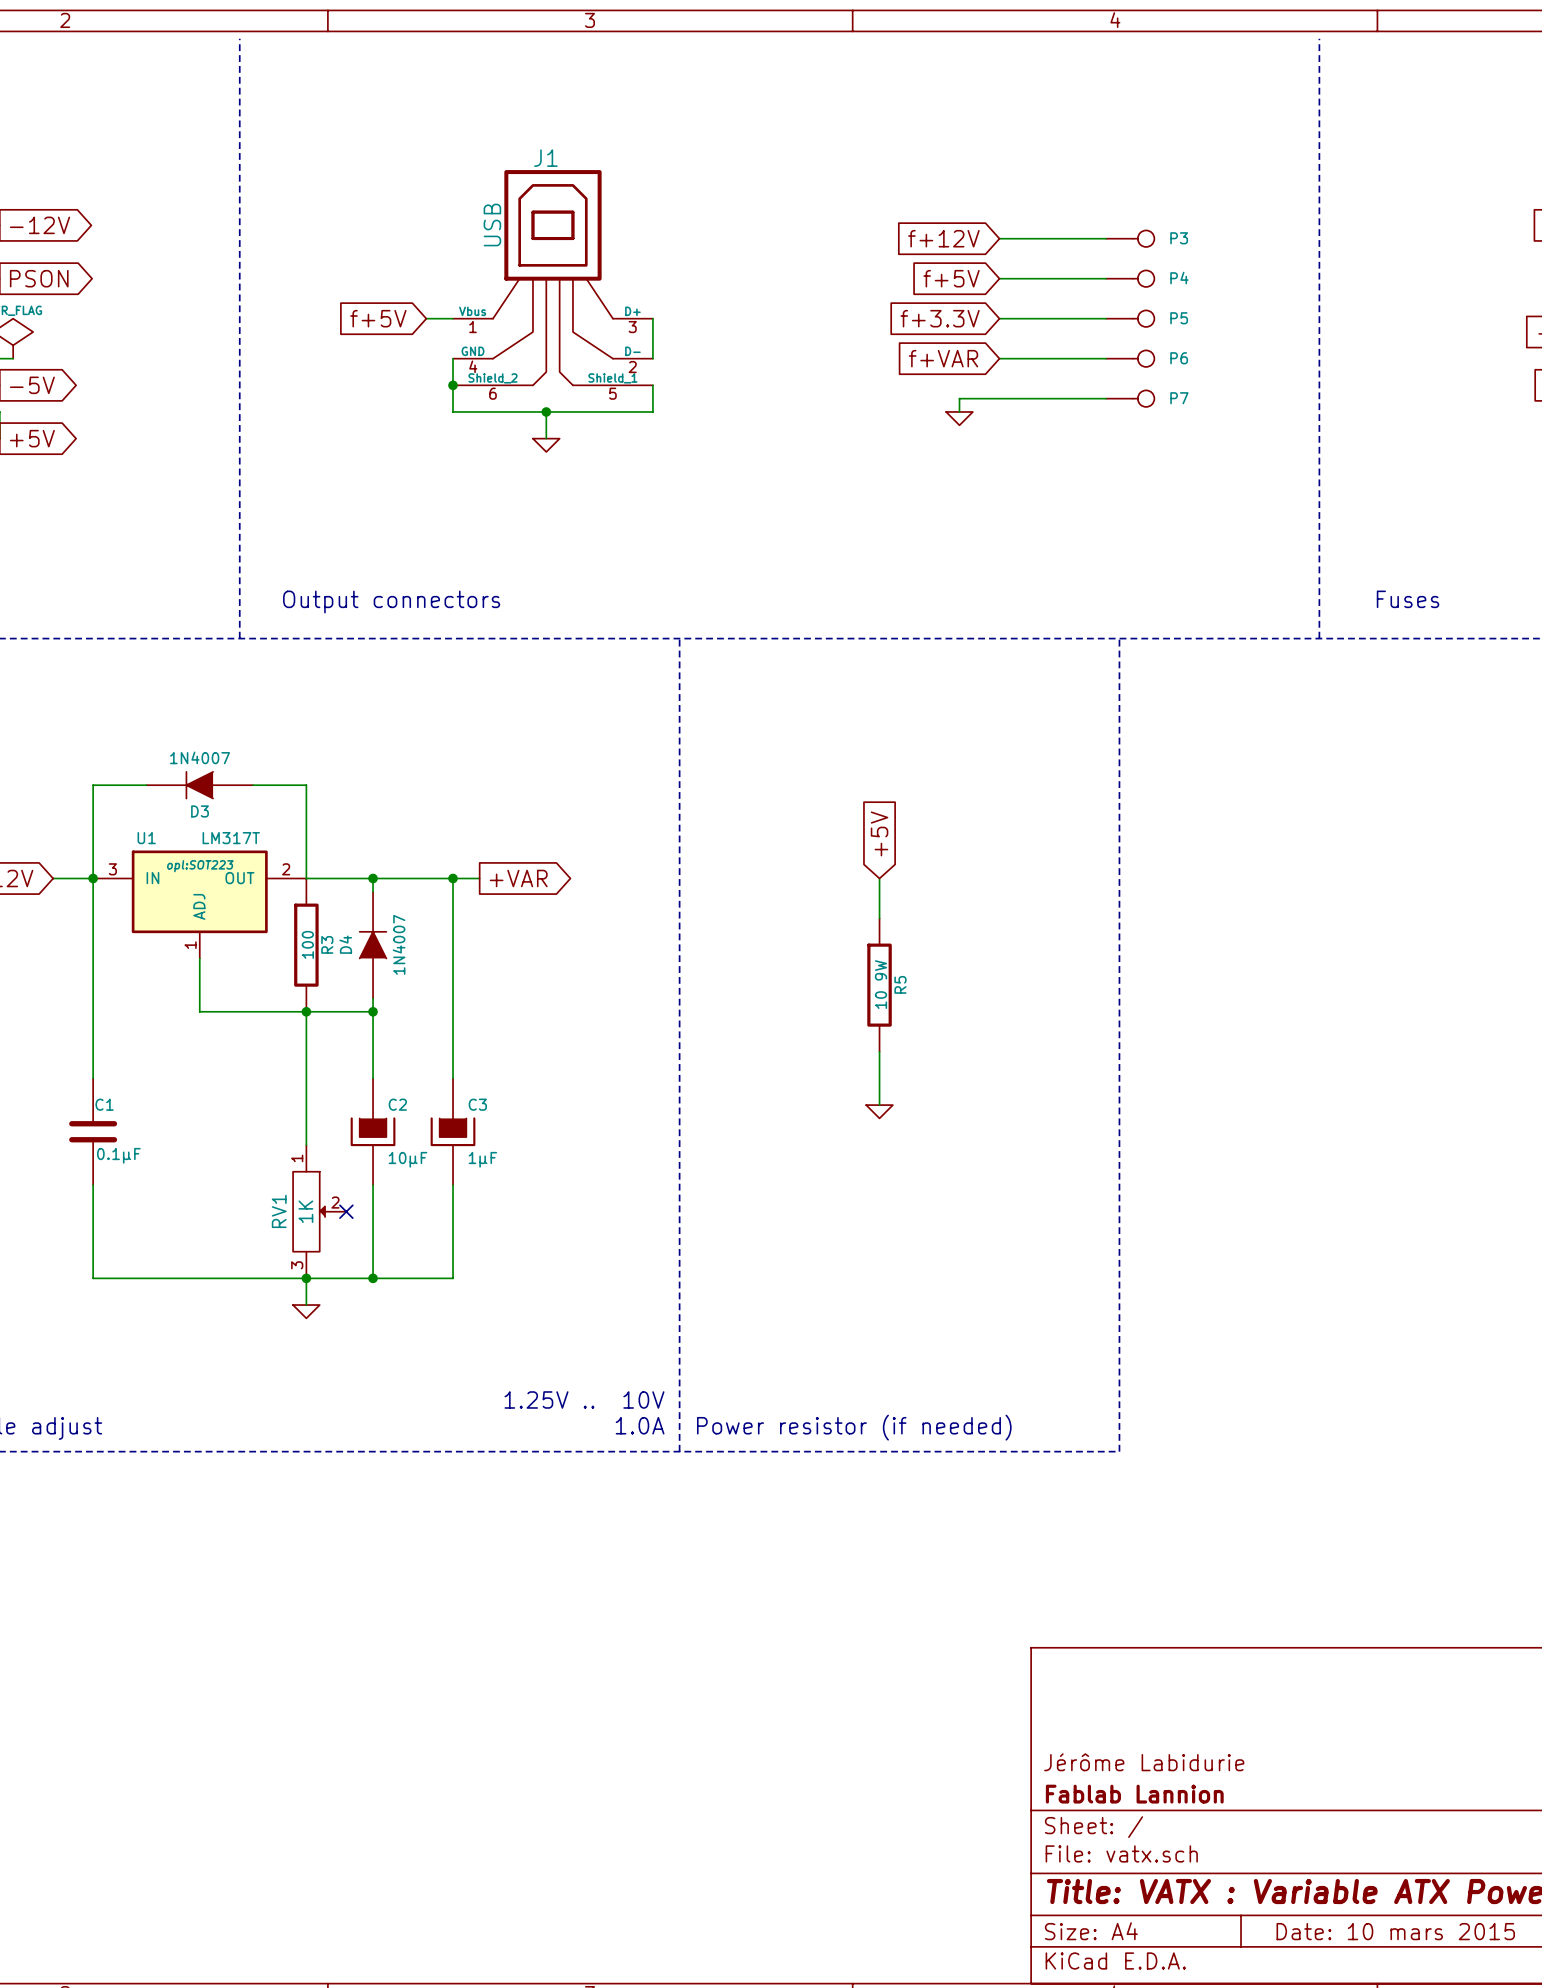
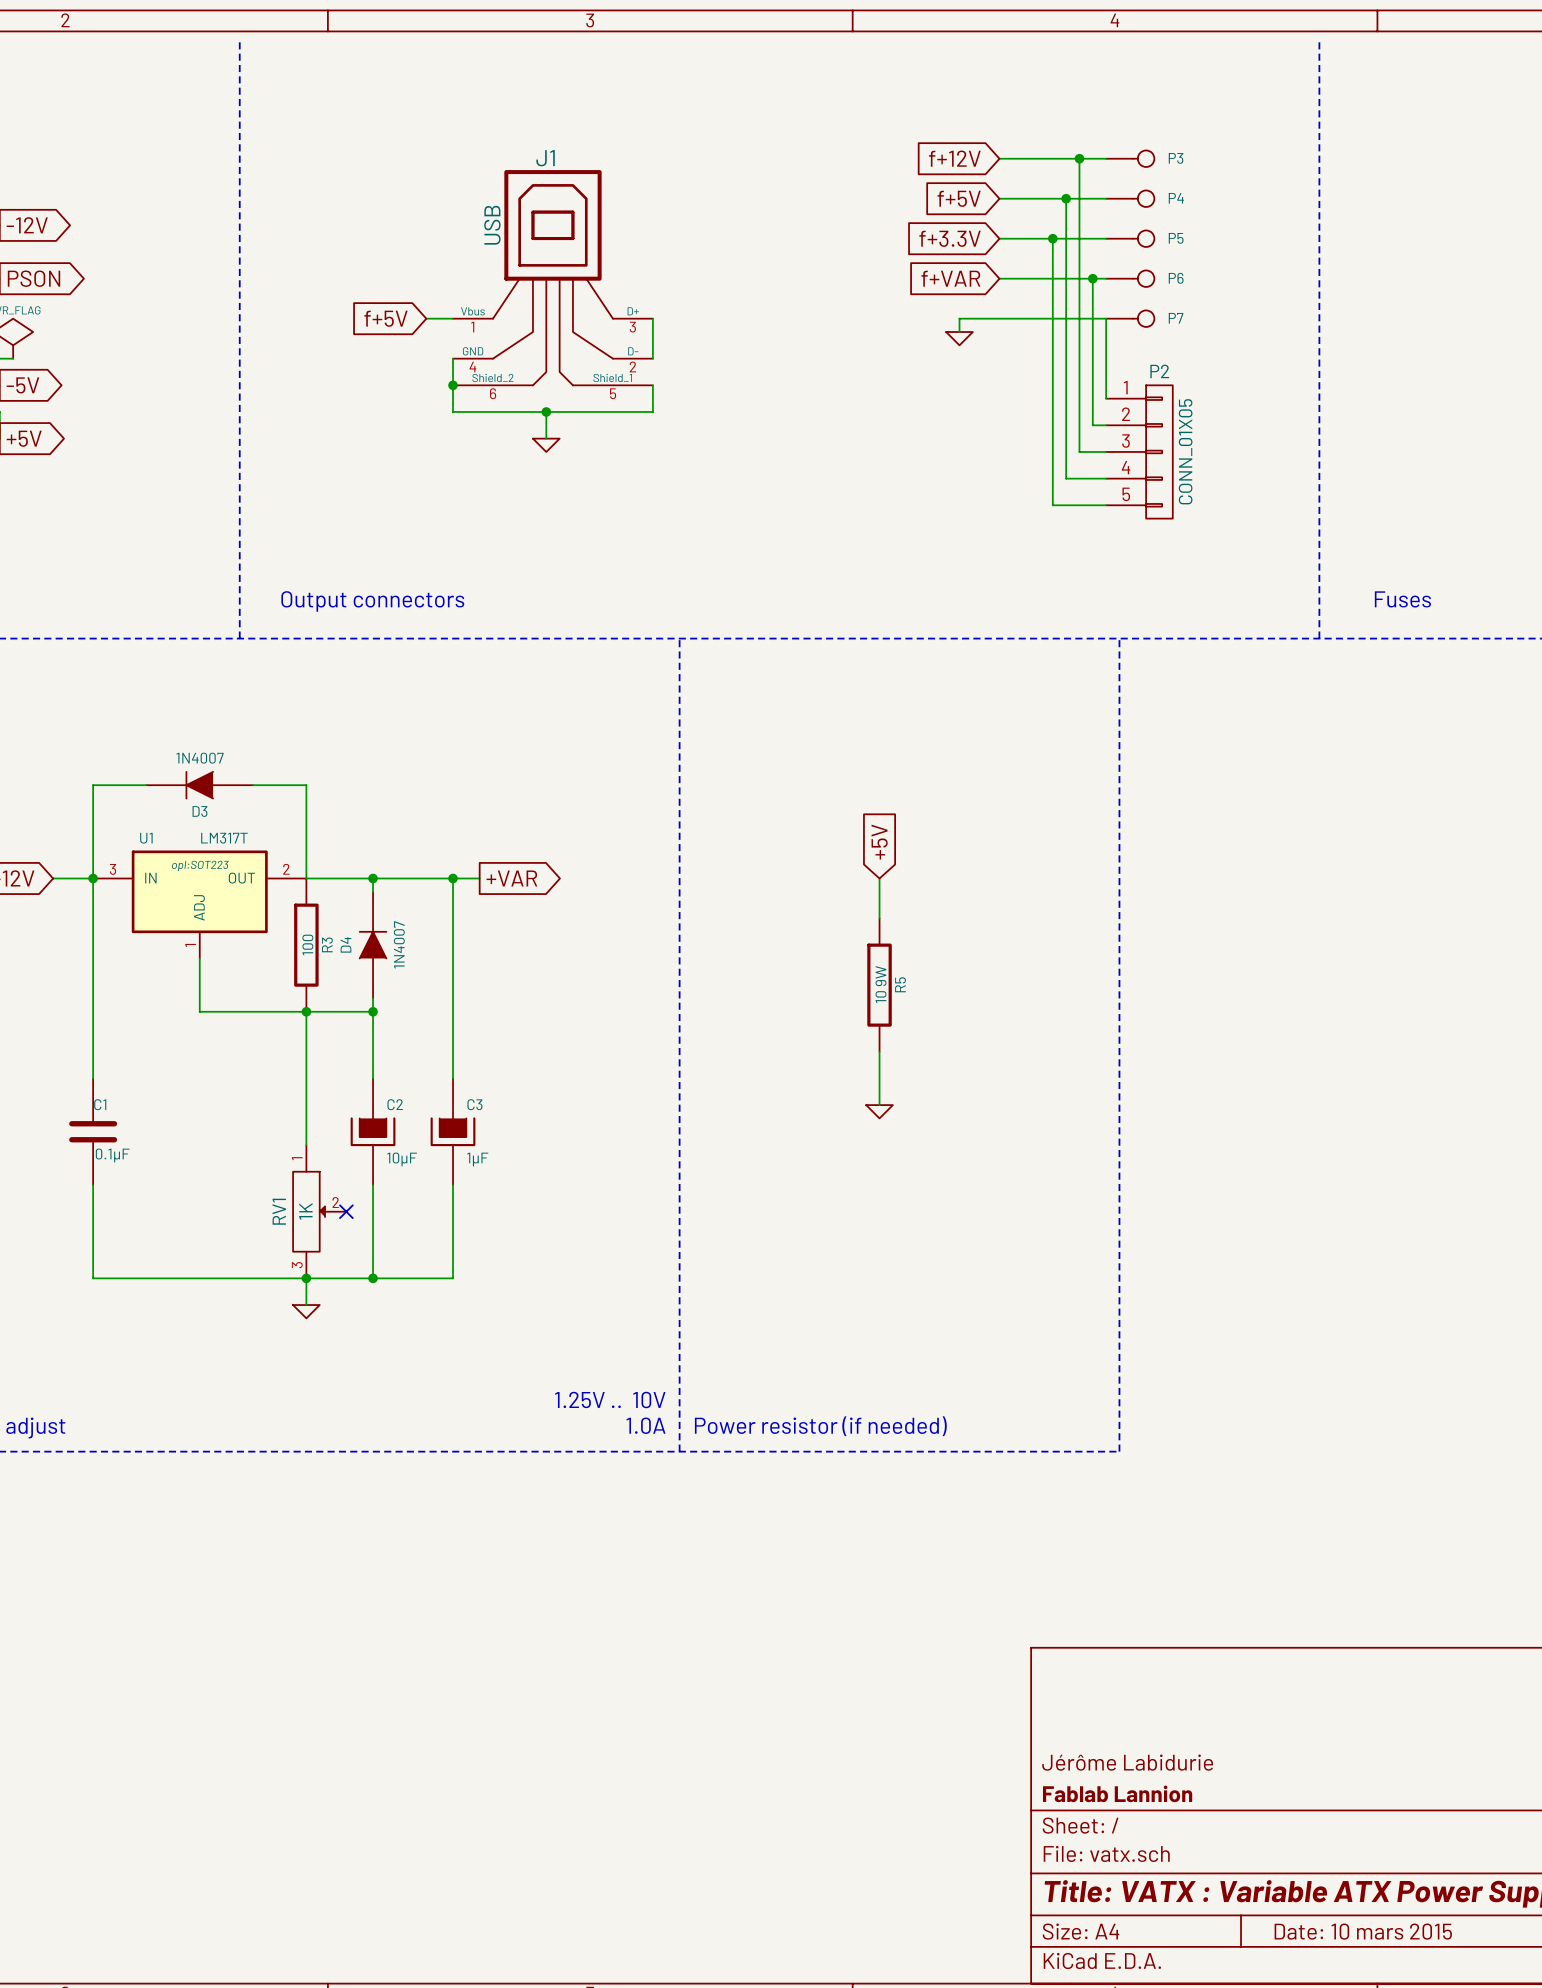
global label: none -> f+12V (954, 158)
wire: none -> (999, 158) (1106, 158)
wire: none -> (1079, 158) (1079, 451) (1106, 451)
junction: none -> (1079, 158)
P3: none -> (1130, 158)
global label: none -> f+5V (959, 198)
wire: none -> (1066, 198) (1066, 478) (1106, 478)
junction: none -> (1066, 198)
P4: none -> (1130, 198)
global label: f+12V (943, 238) -> f+3.3V (950, 238)
wire: none -> (1052, 238) (1052, 505) (1106, 505)
junction: none -> (1052, 238)
P3 name: P3 (1179, 238) -> P5 (1176, 238)
global label: f+5V (951, 278) -> f+VAR (950, 278)
wire: none -> (1092, 278) (1092, 425) (1106, 425)
junction: none -> (1092, 278)
P4 name: P4 (1179, 278) -> P6 (1176, 278)
global label: f+3.3V (940, 318) -> none
wire: none -> (999, 318) (959, 318) (959, 332)
P5 name: P5 (1179, 318) -> P7 (1176, 318)
global label: f+VAR (943, 358) -> none
wire: (999, 358) (1106, 358) -> (999, 198) (1106, 198)
P6: (1130, 358) -> none
wire: (1106, 398) (959, 398) (959, 411) -> (1106, 398) (1106, 318)
P7: (1130, 398) -> none
power symbol position: (959, 418) -> (959, 338)
P2: none -> CONN_01X05 (1139, 451)

